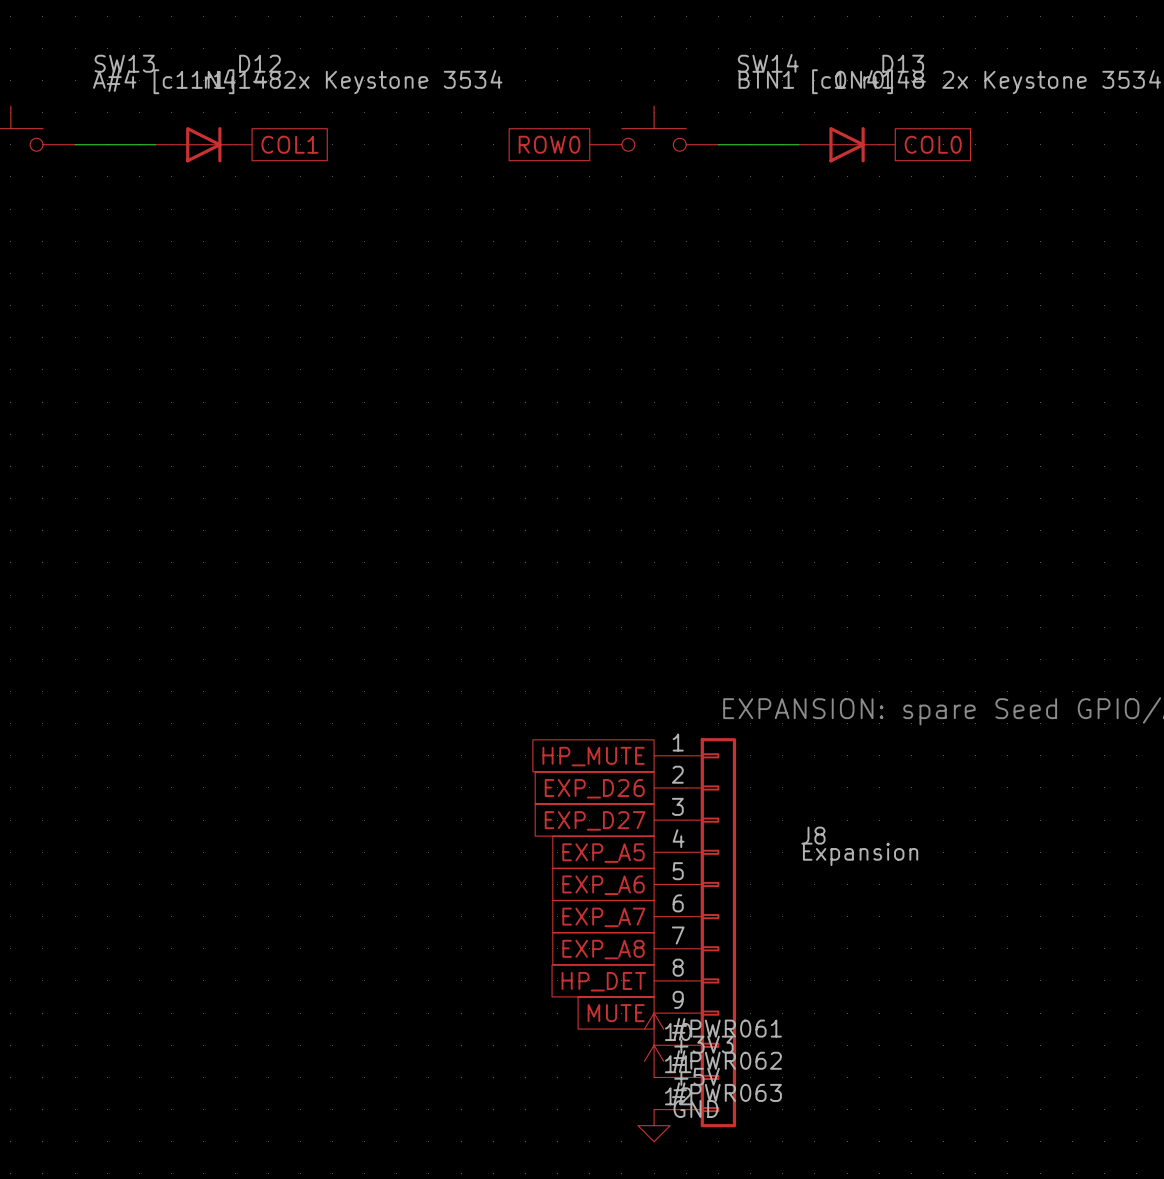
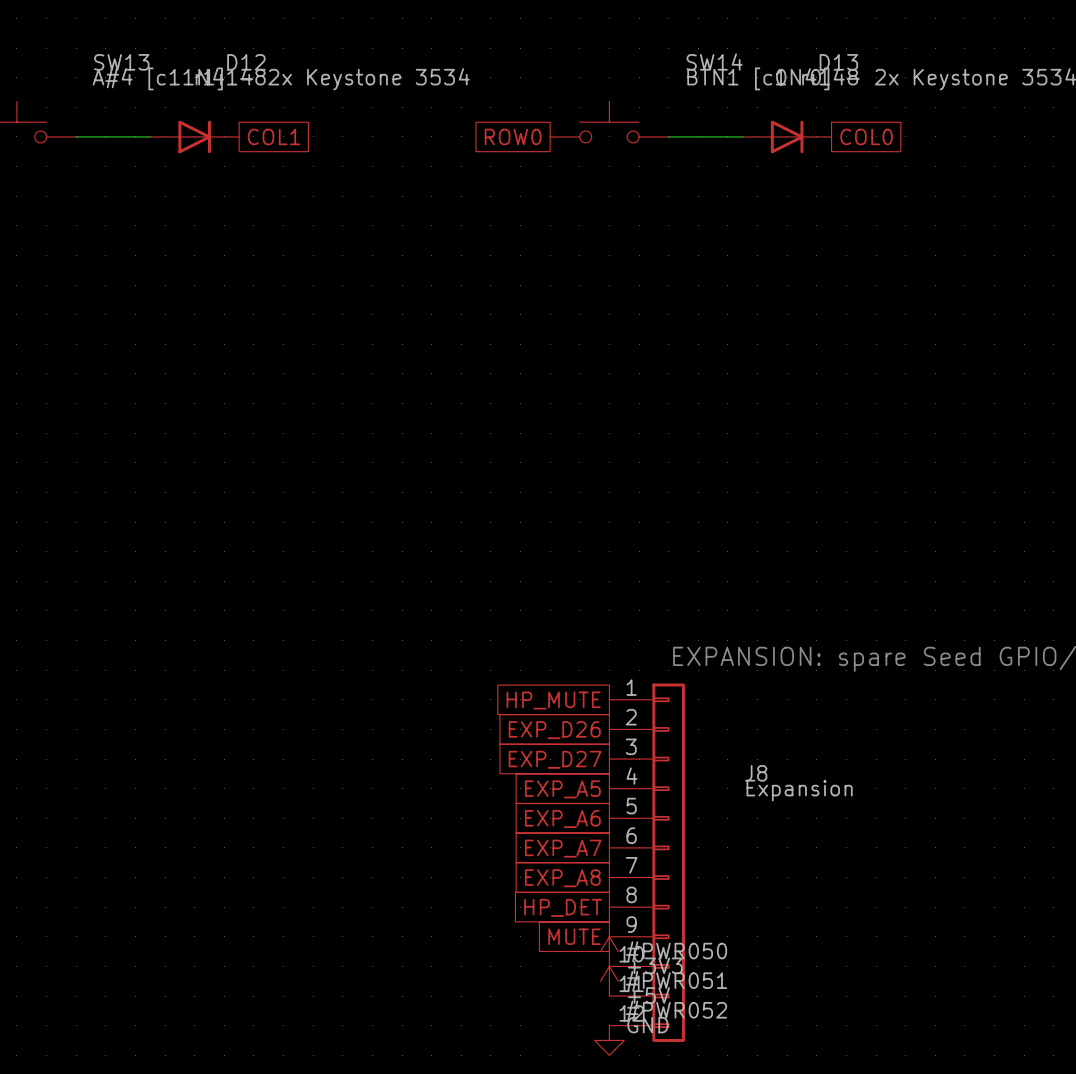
#PWR061 name: #PWR061 (726, 1029) -> #PWR050 (676, 951)
#PWR062 name: #PWR062 (726, 1061) -> #PWR051 (676, 981)
#PWR063 name: #PWR063 (726, 1093) -> #PWR052 (676, 1010)

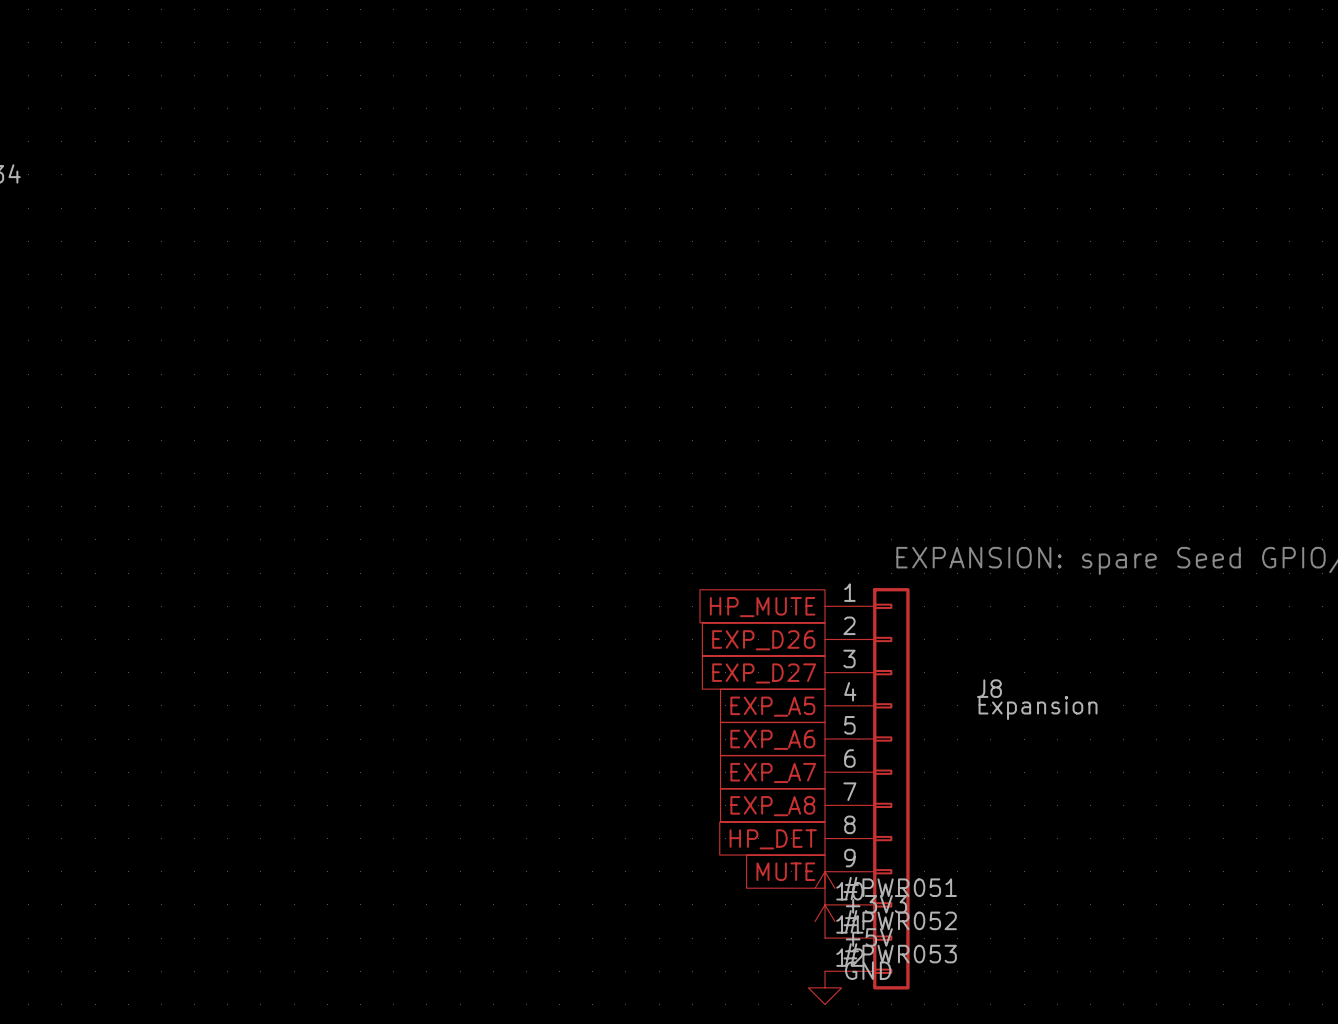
#PWR050 name: #PWR050 (676, 951) -> #PWR051 (900, 888)
#PWR051 name: #PWR051 (676, 981) -> #PWR052 (900, 921)
#PWR052 name: #PWR052 (676, 1010) -> #PWR053 (900, 954)

